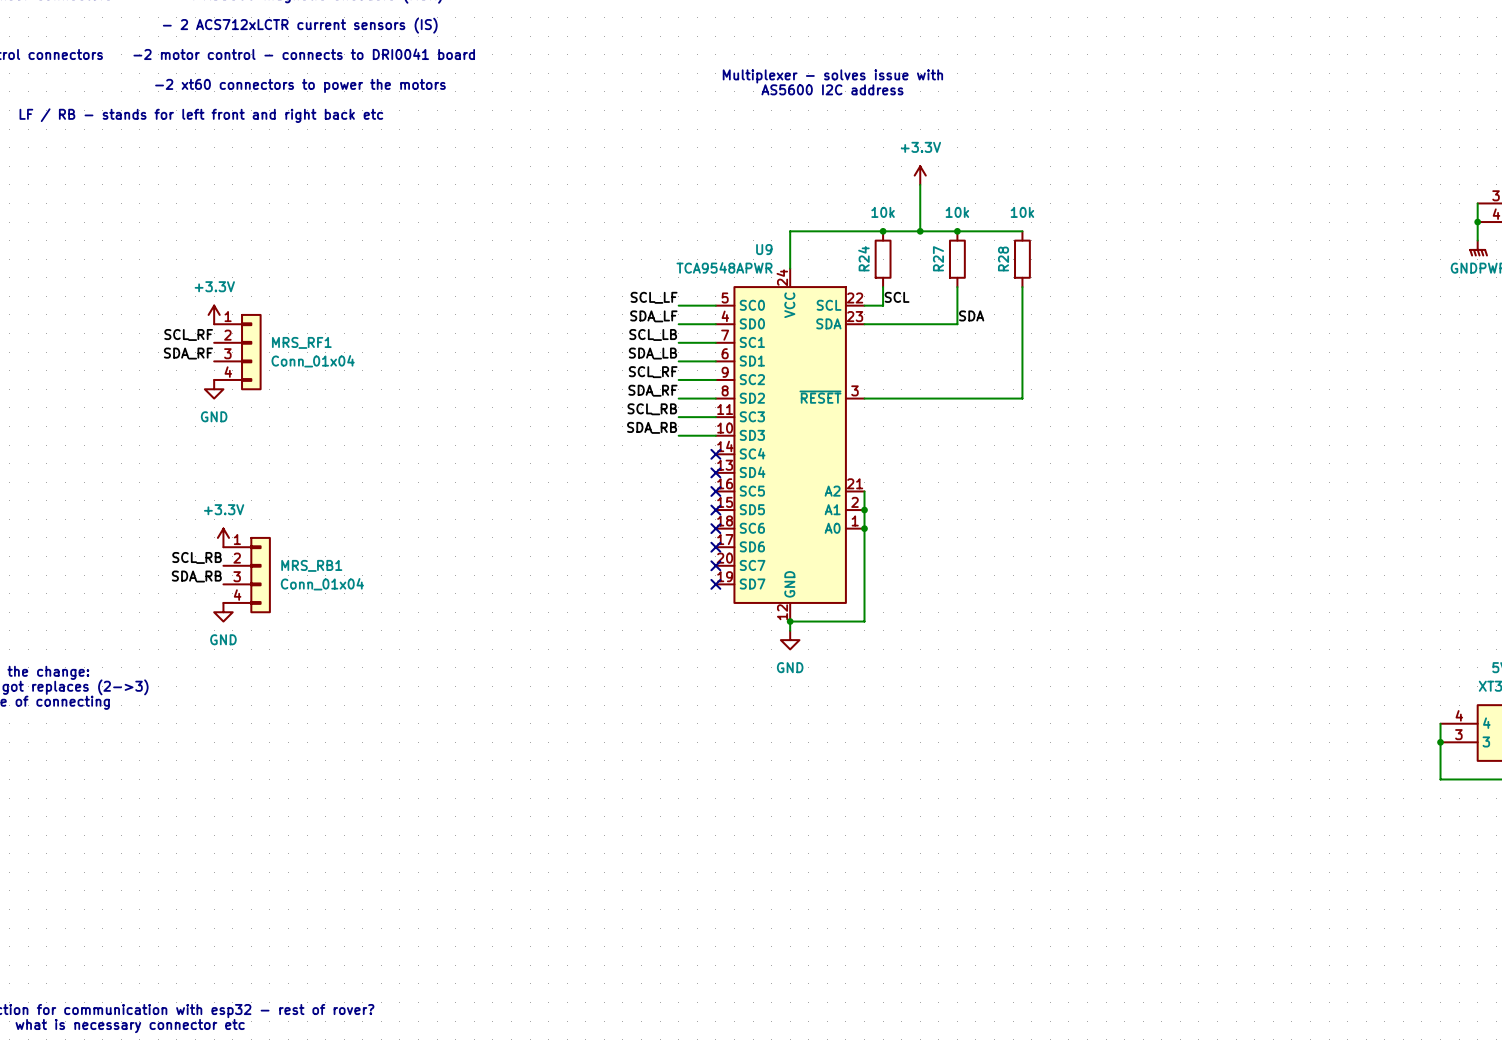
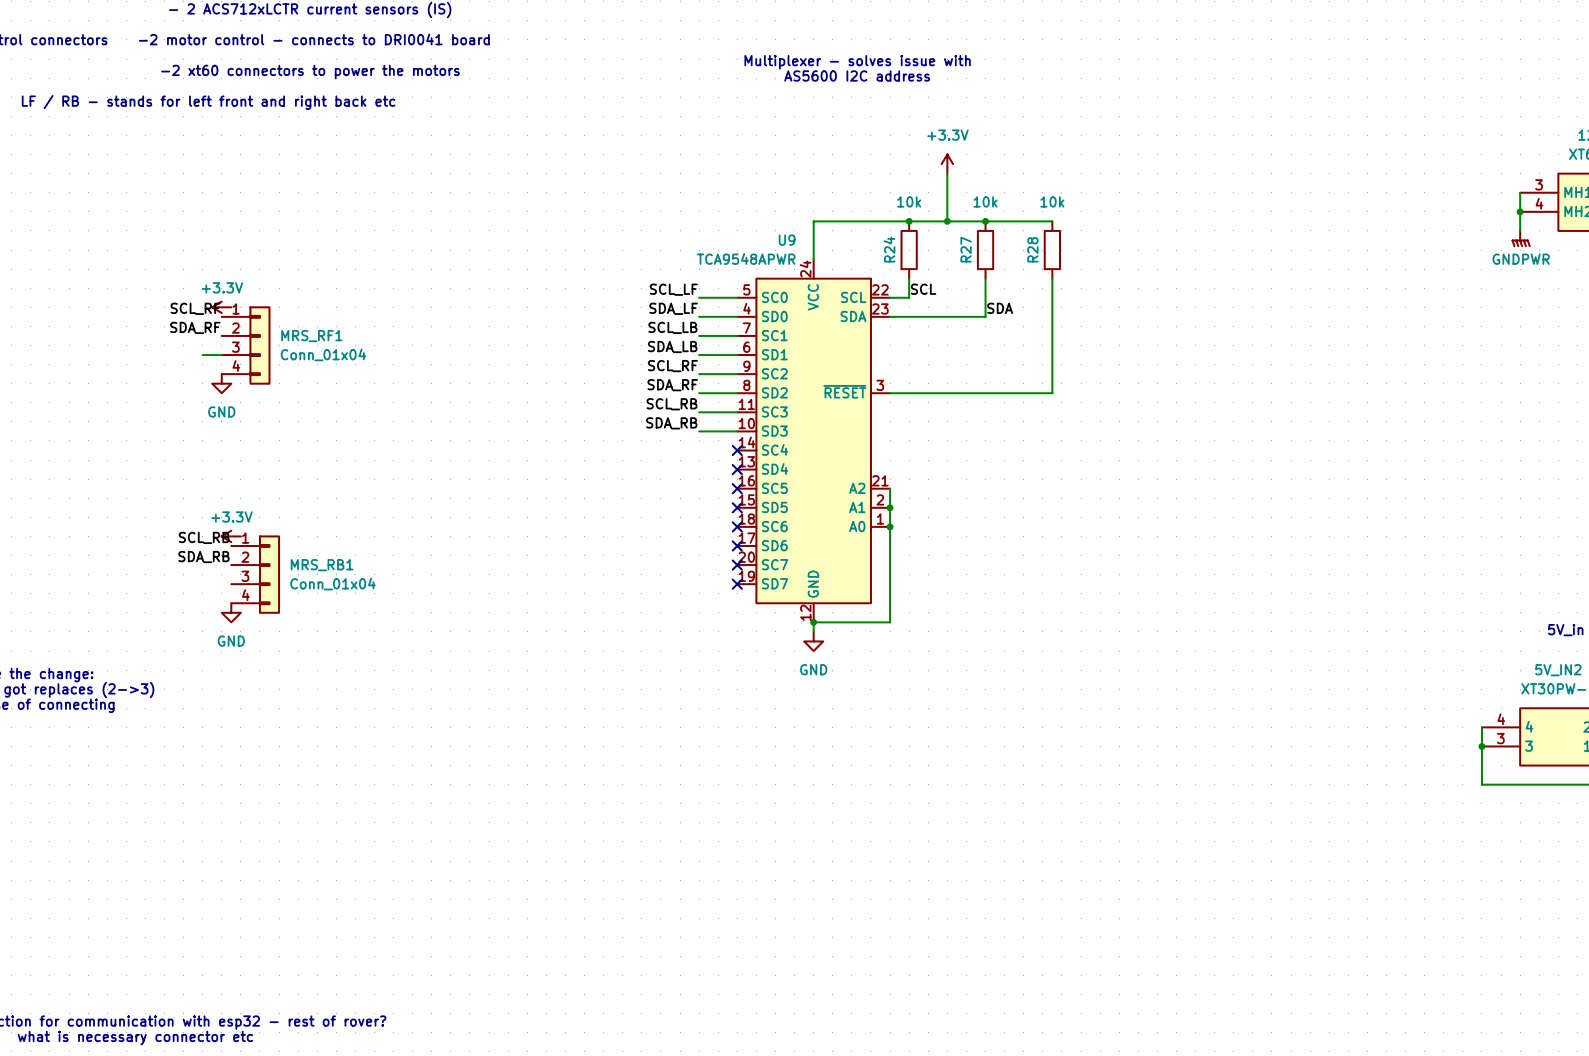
power symbol rotation: 0° (214, 314) -> 90° counterclockwise (221, 307)
label: none -> SCL_RF (195, 308)
label: SCL_RF (188, 334) -> SDA_RF (195, 327)
label: SDA_RF (188, 353) -> none
wire: none -> (202, 355) (221, 355)
power symbol rotation: 0° (223, 537) -> 90° counterclockwise (231, 536)
label: none -> SCL_RB (204, 537)
label: SCL_RB (197, 557) -> SDA_RB (203, 557)
label: SDA_RB (196, 576) -> none

